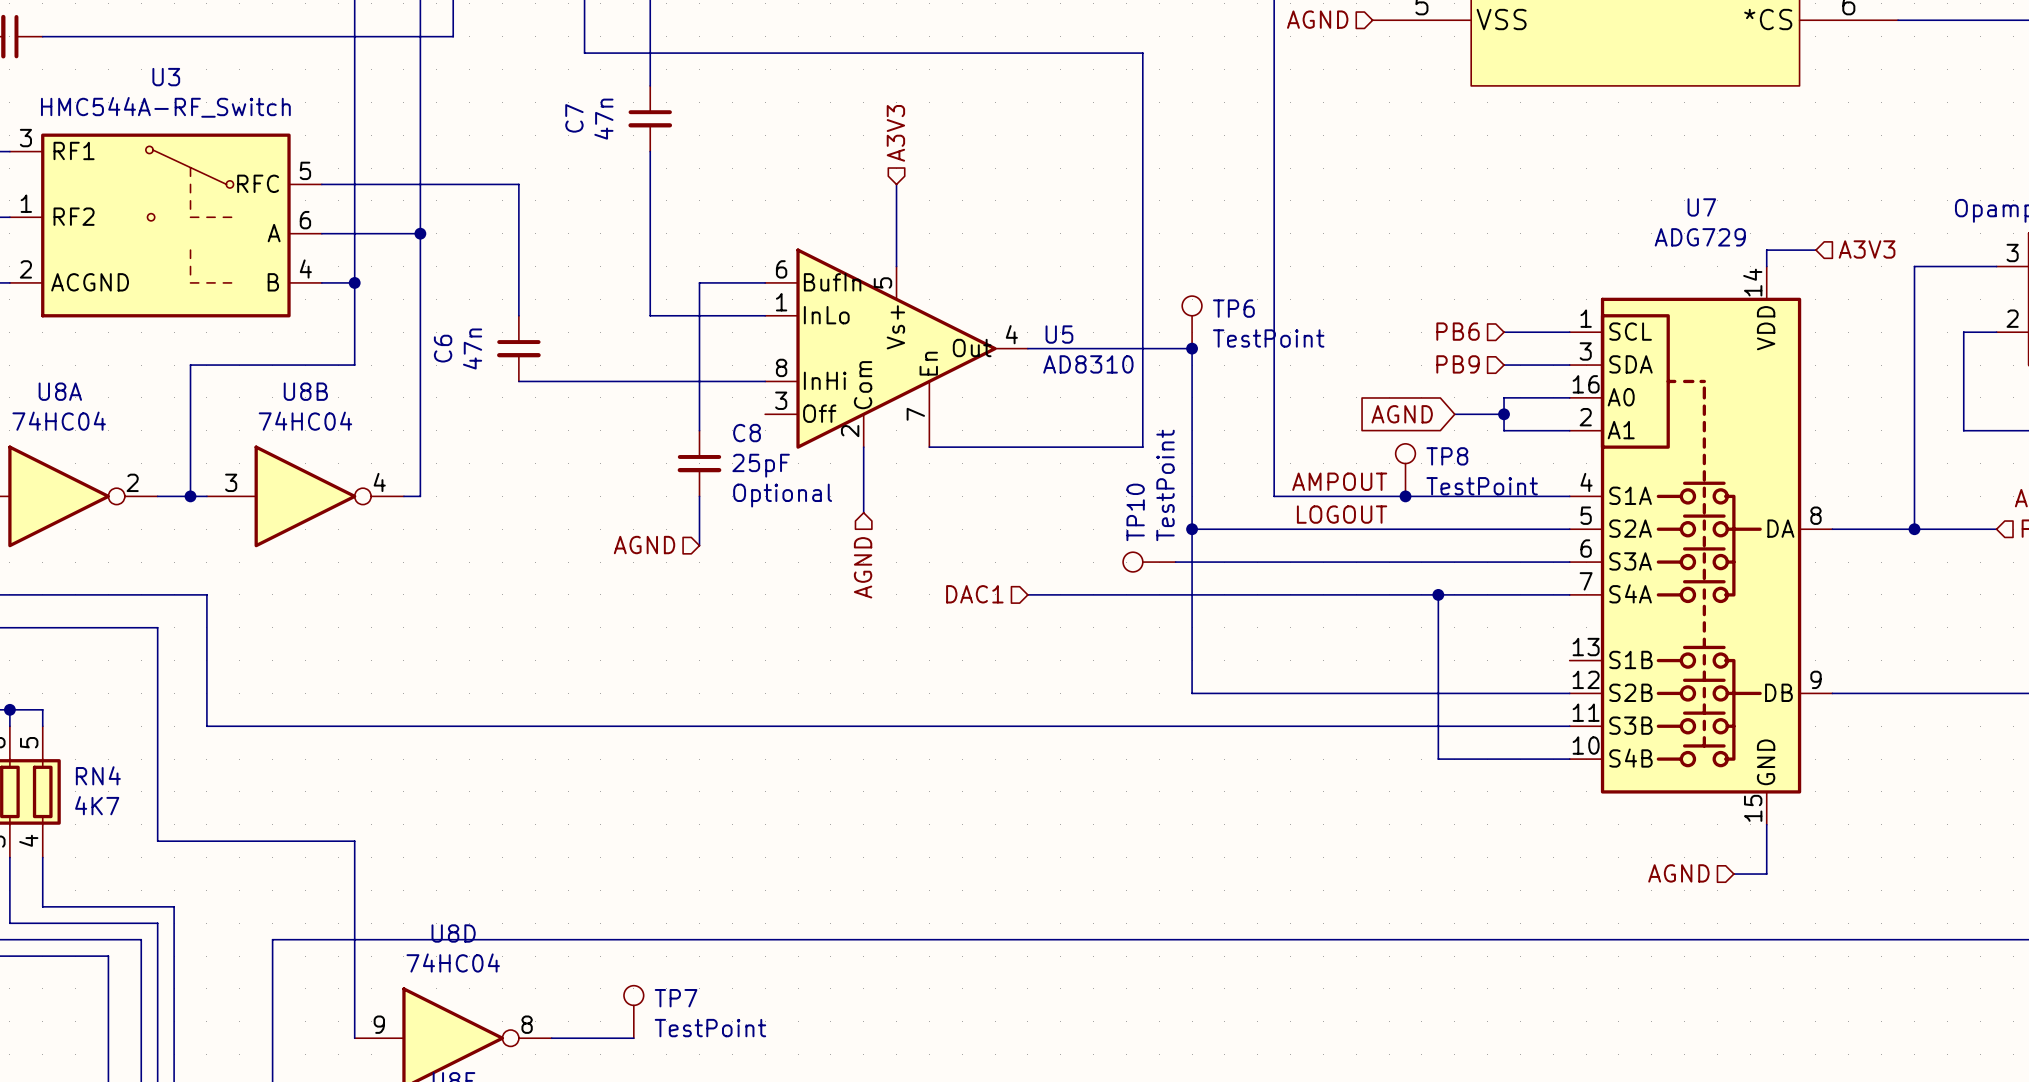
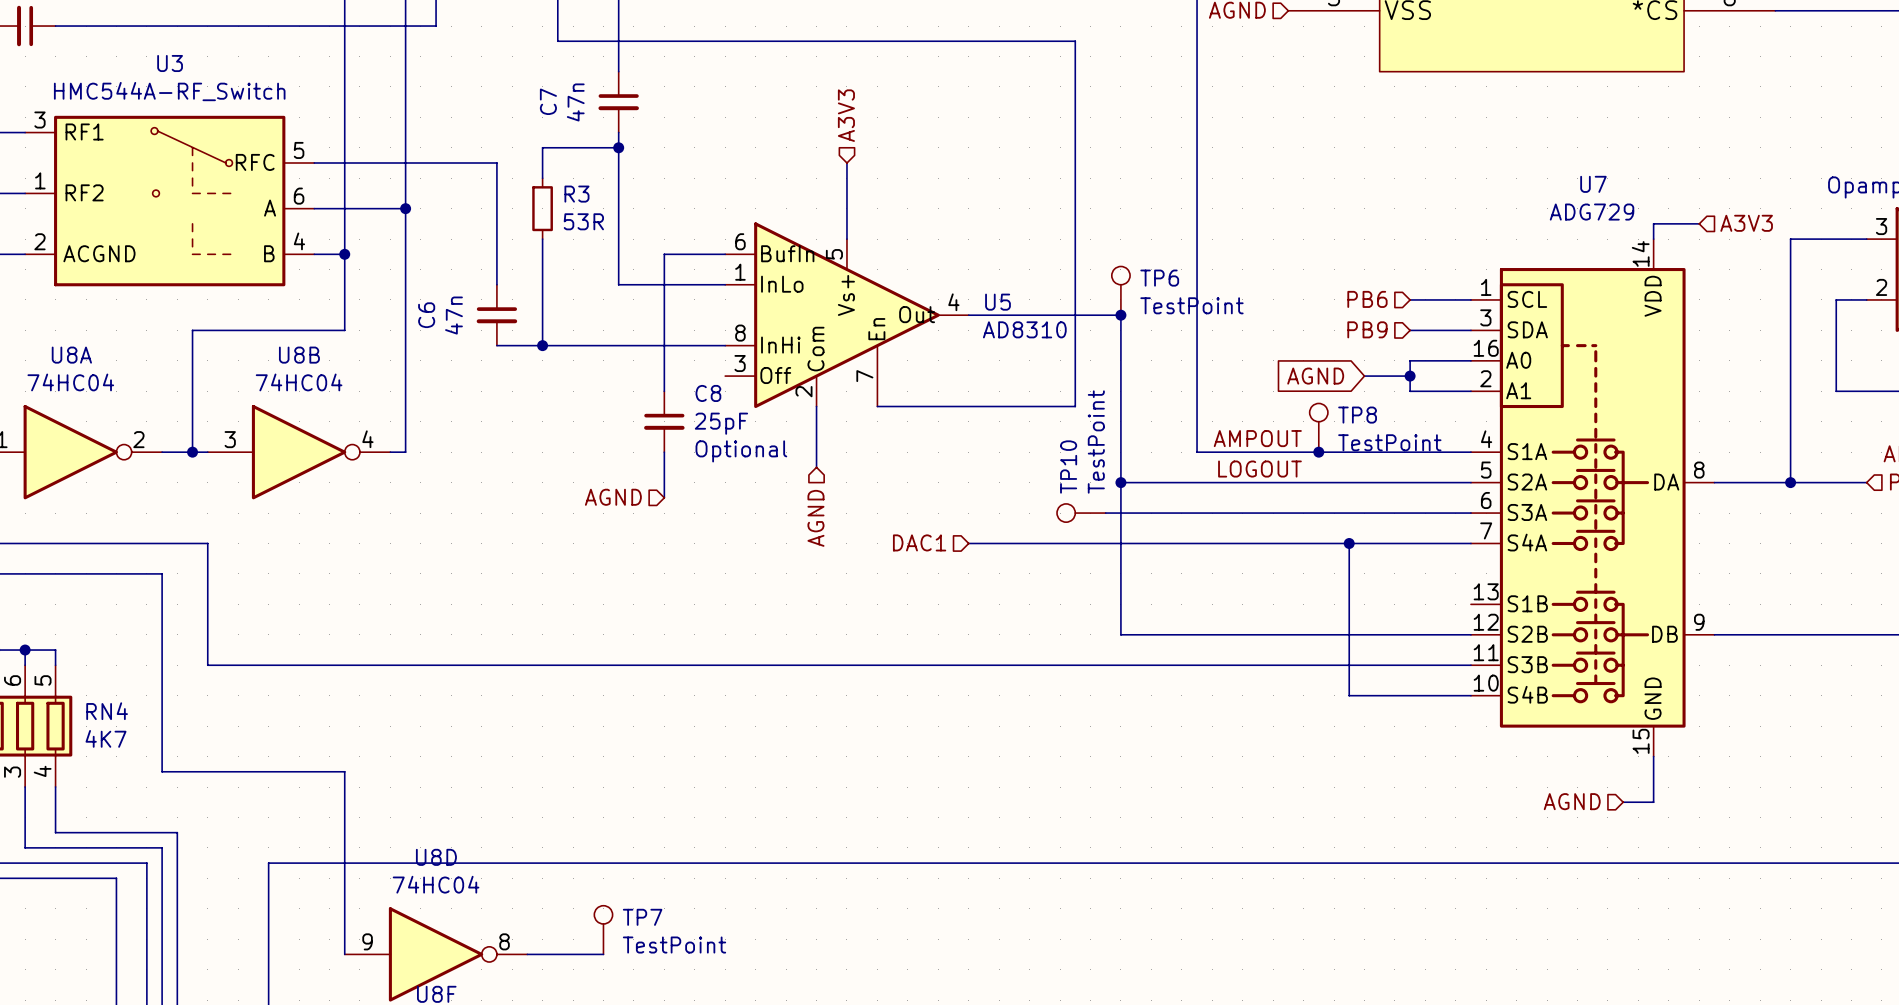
wire: none -> (618, 147) (542, 147) (542, 178)
junction: none -> (618, 147)
R3: none -> 53R (542, 208)
wire: none -> (542, 239) (542, 345)
junction: none -> (542, 345)

